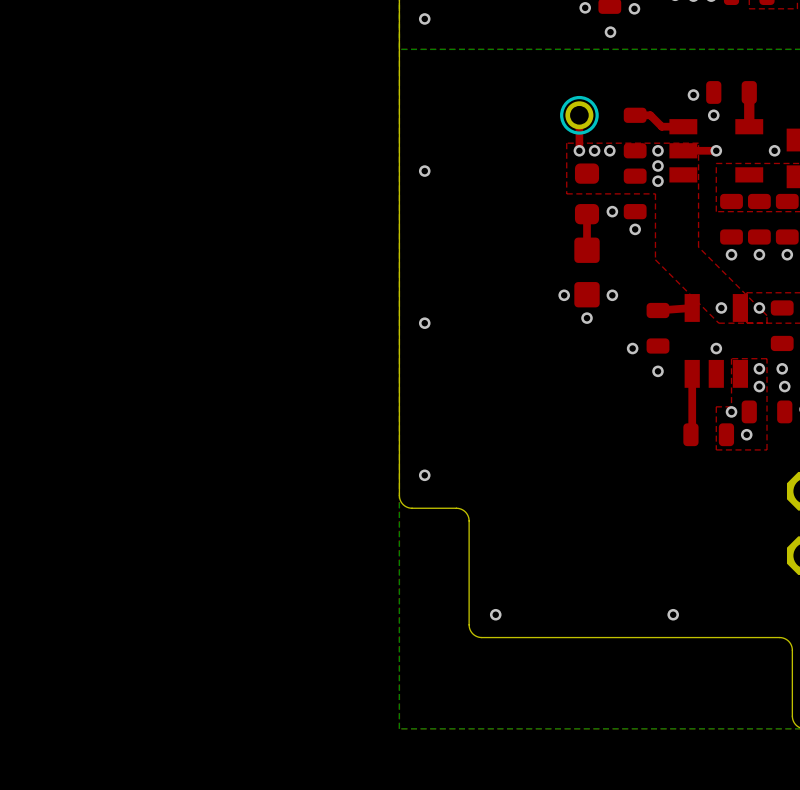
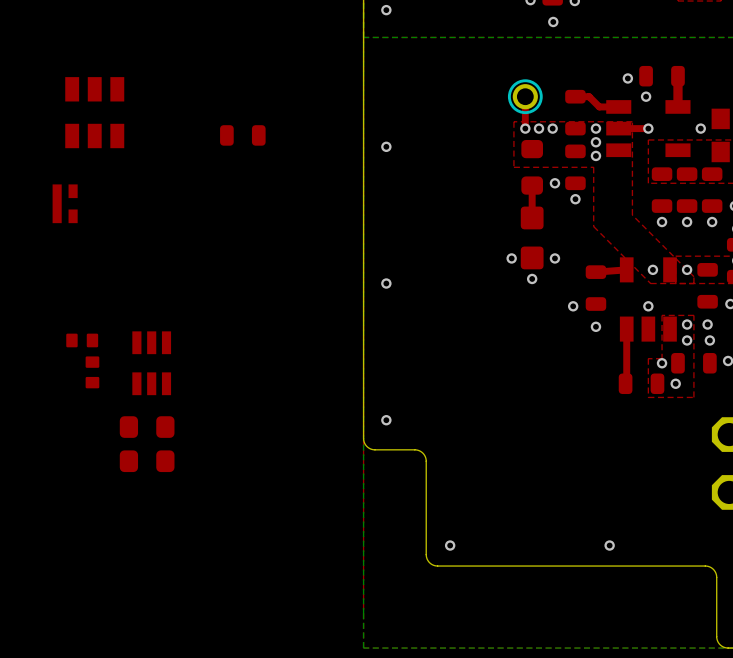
part: none -> (94, 112)
part: none -> (242, 135)
part: none -> (65, 203)
part: none -> (82, 340)
part: none -> (151, 363)
part: none -> (92, 372)
part: none -> (147, 427)
part: none -> (147, 461)

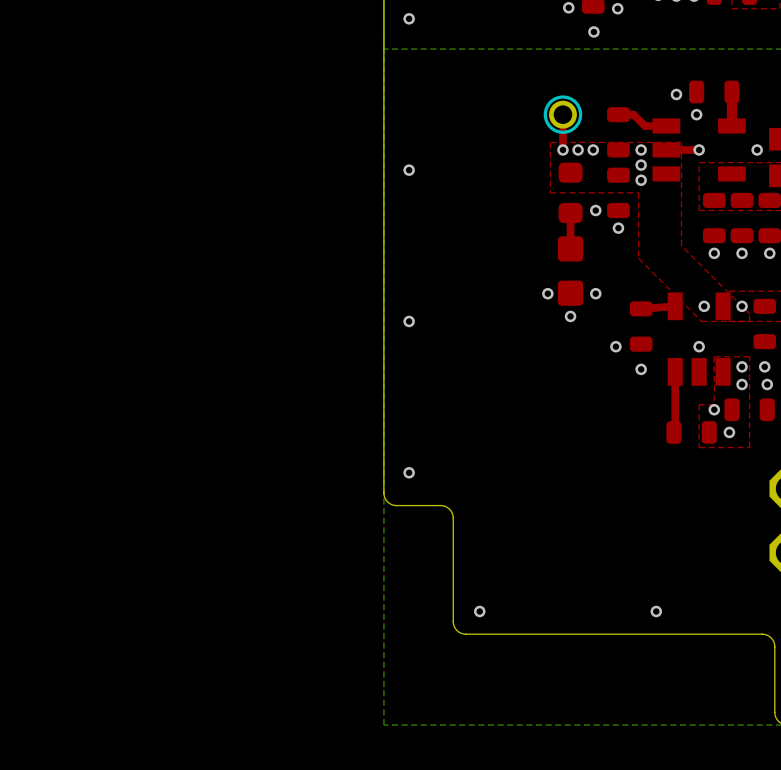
part: (94, 112) -> none
part: (242, 135) -> none
part: (65, 203) -> none
part: (82, 340) -> none
part: (151, 363) -> none
part: (92, 372) -> none
part: (147, 427) -> none
part: (147, 461) -> none

